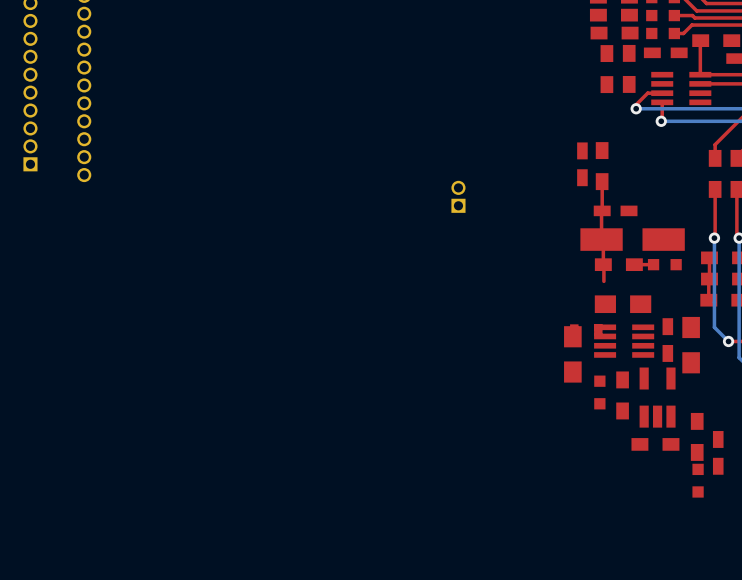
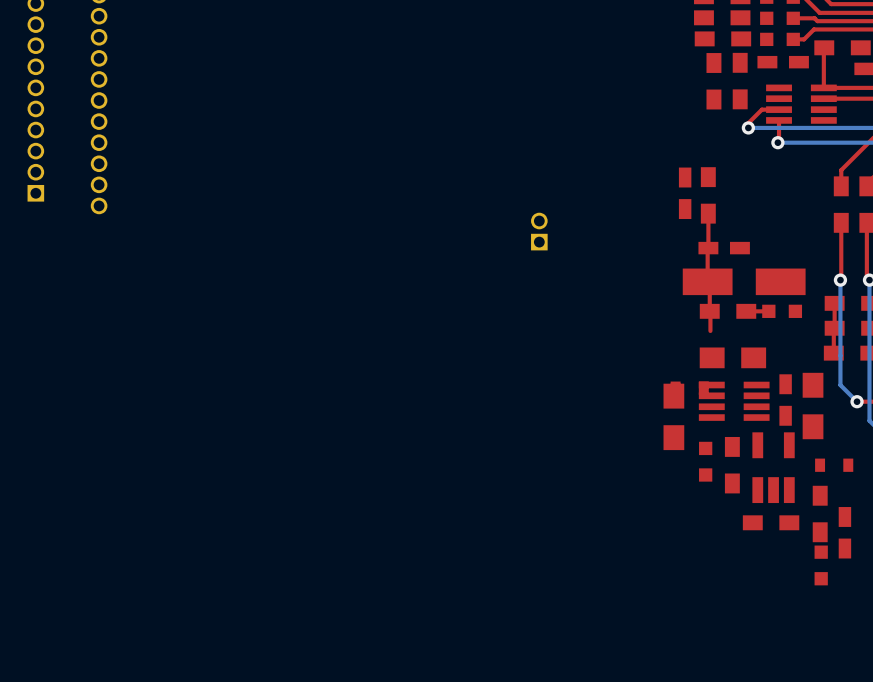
part: none -> (834, 465)

